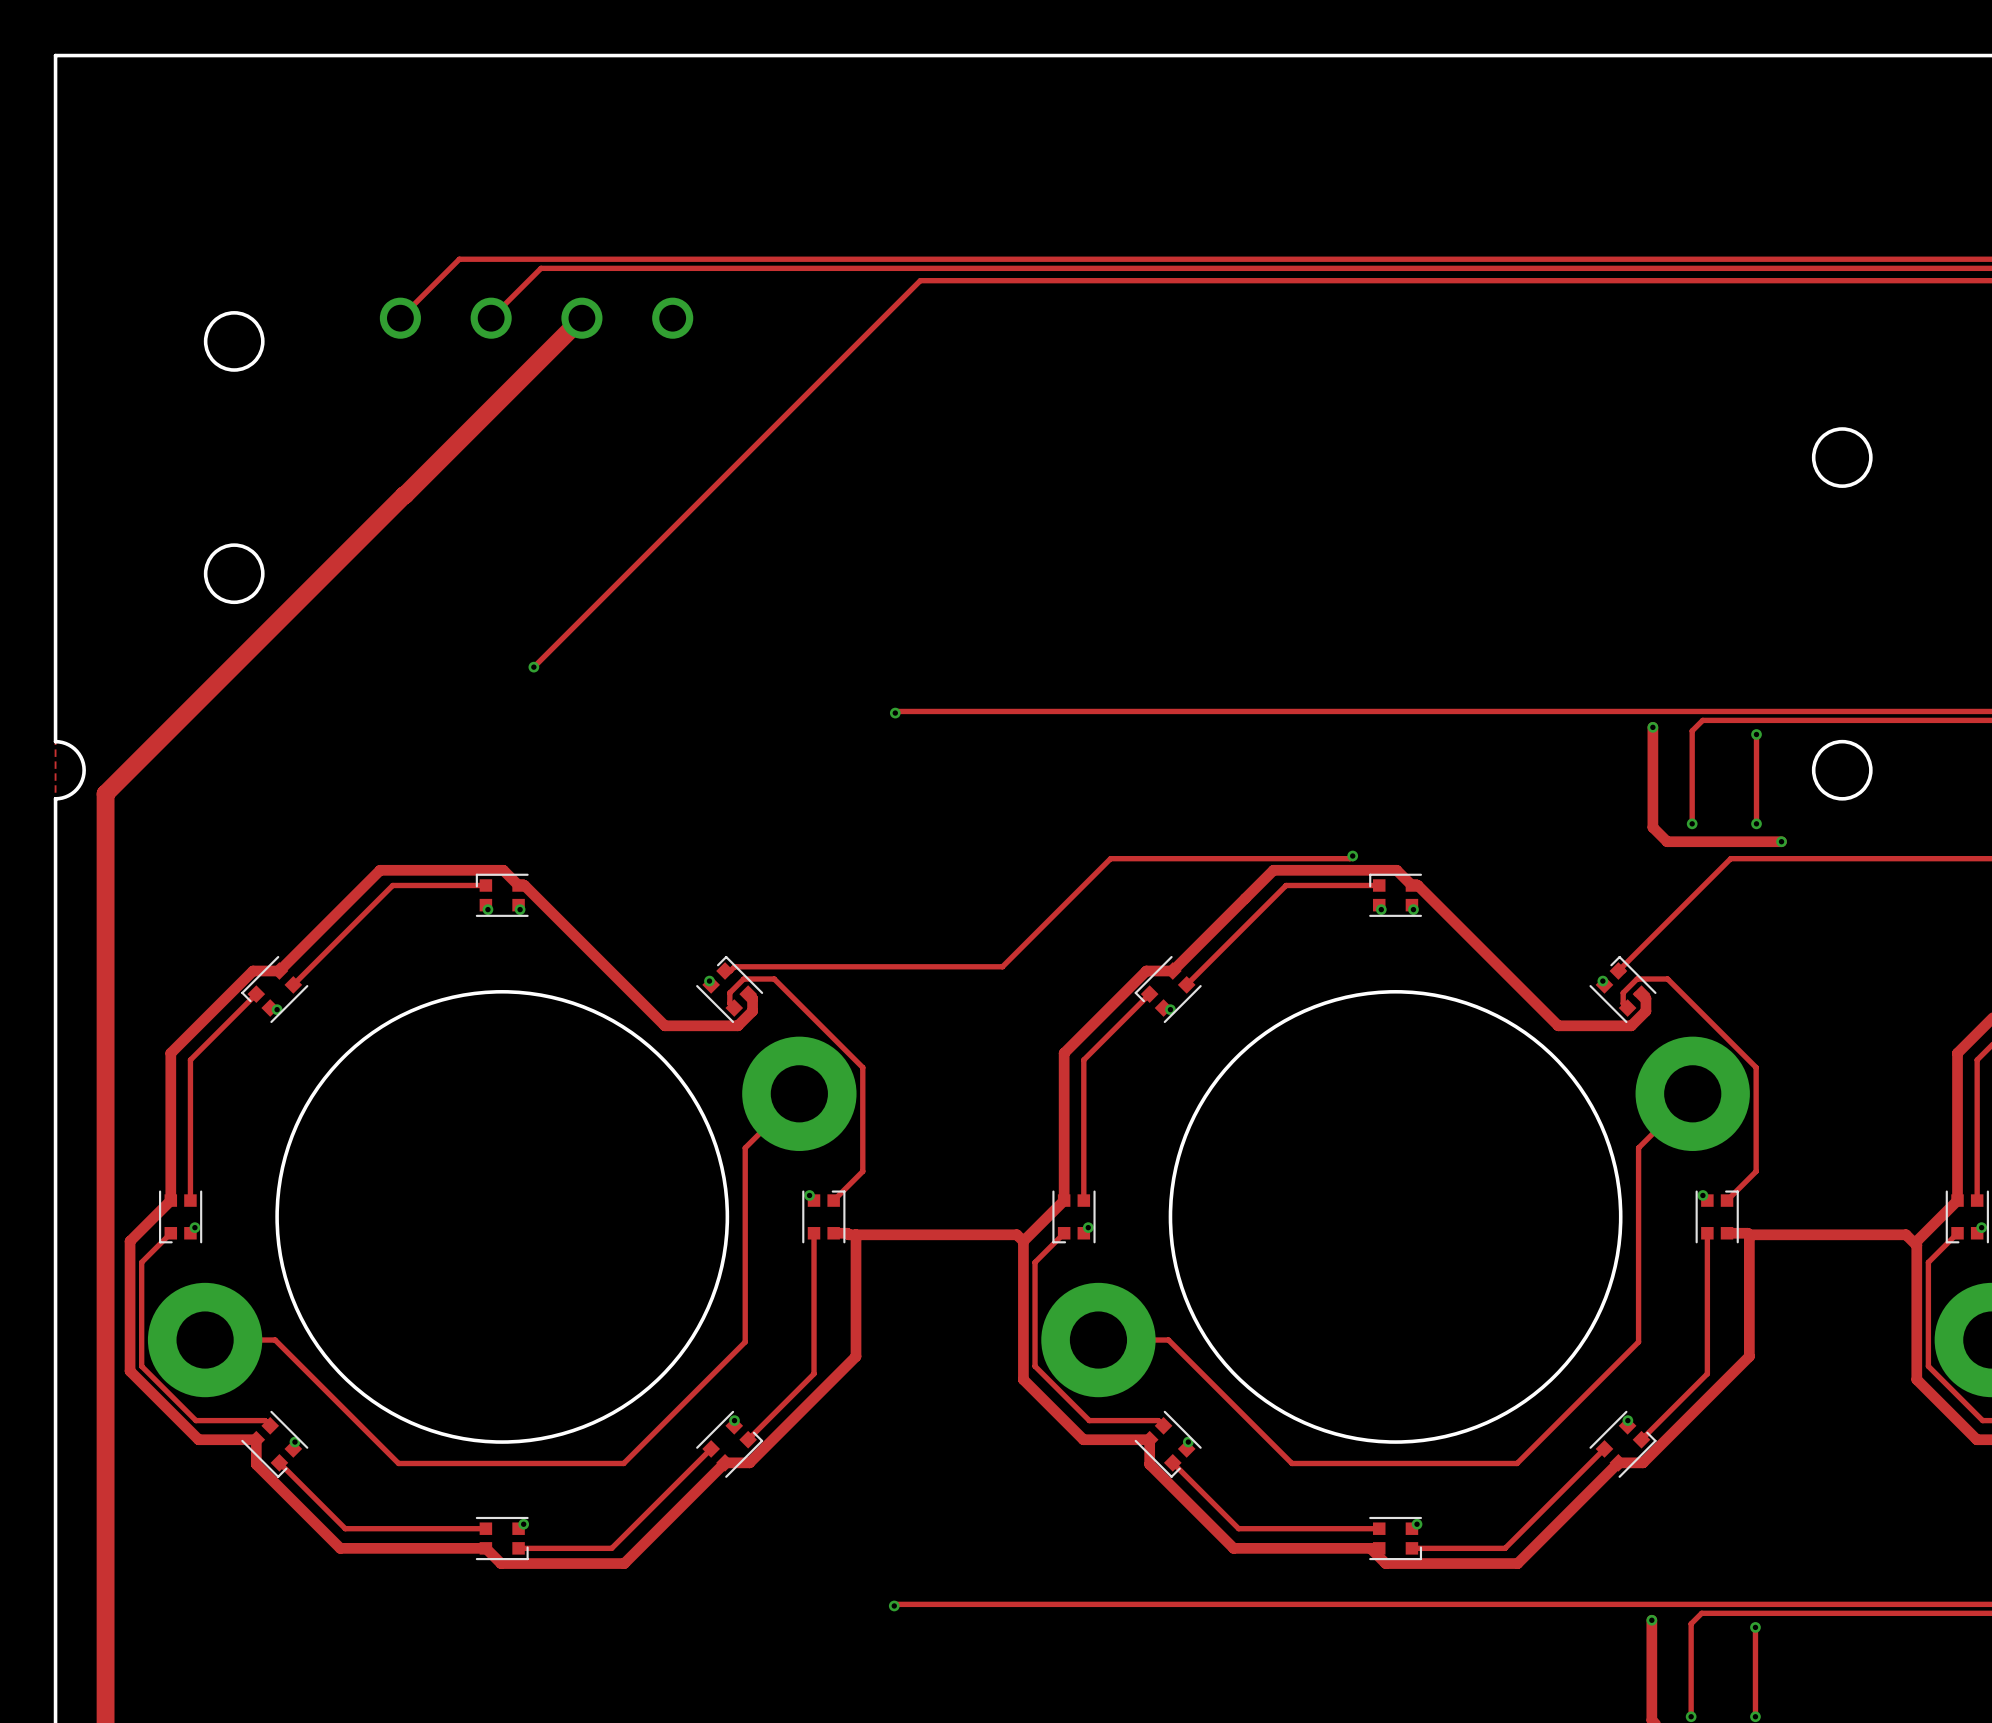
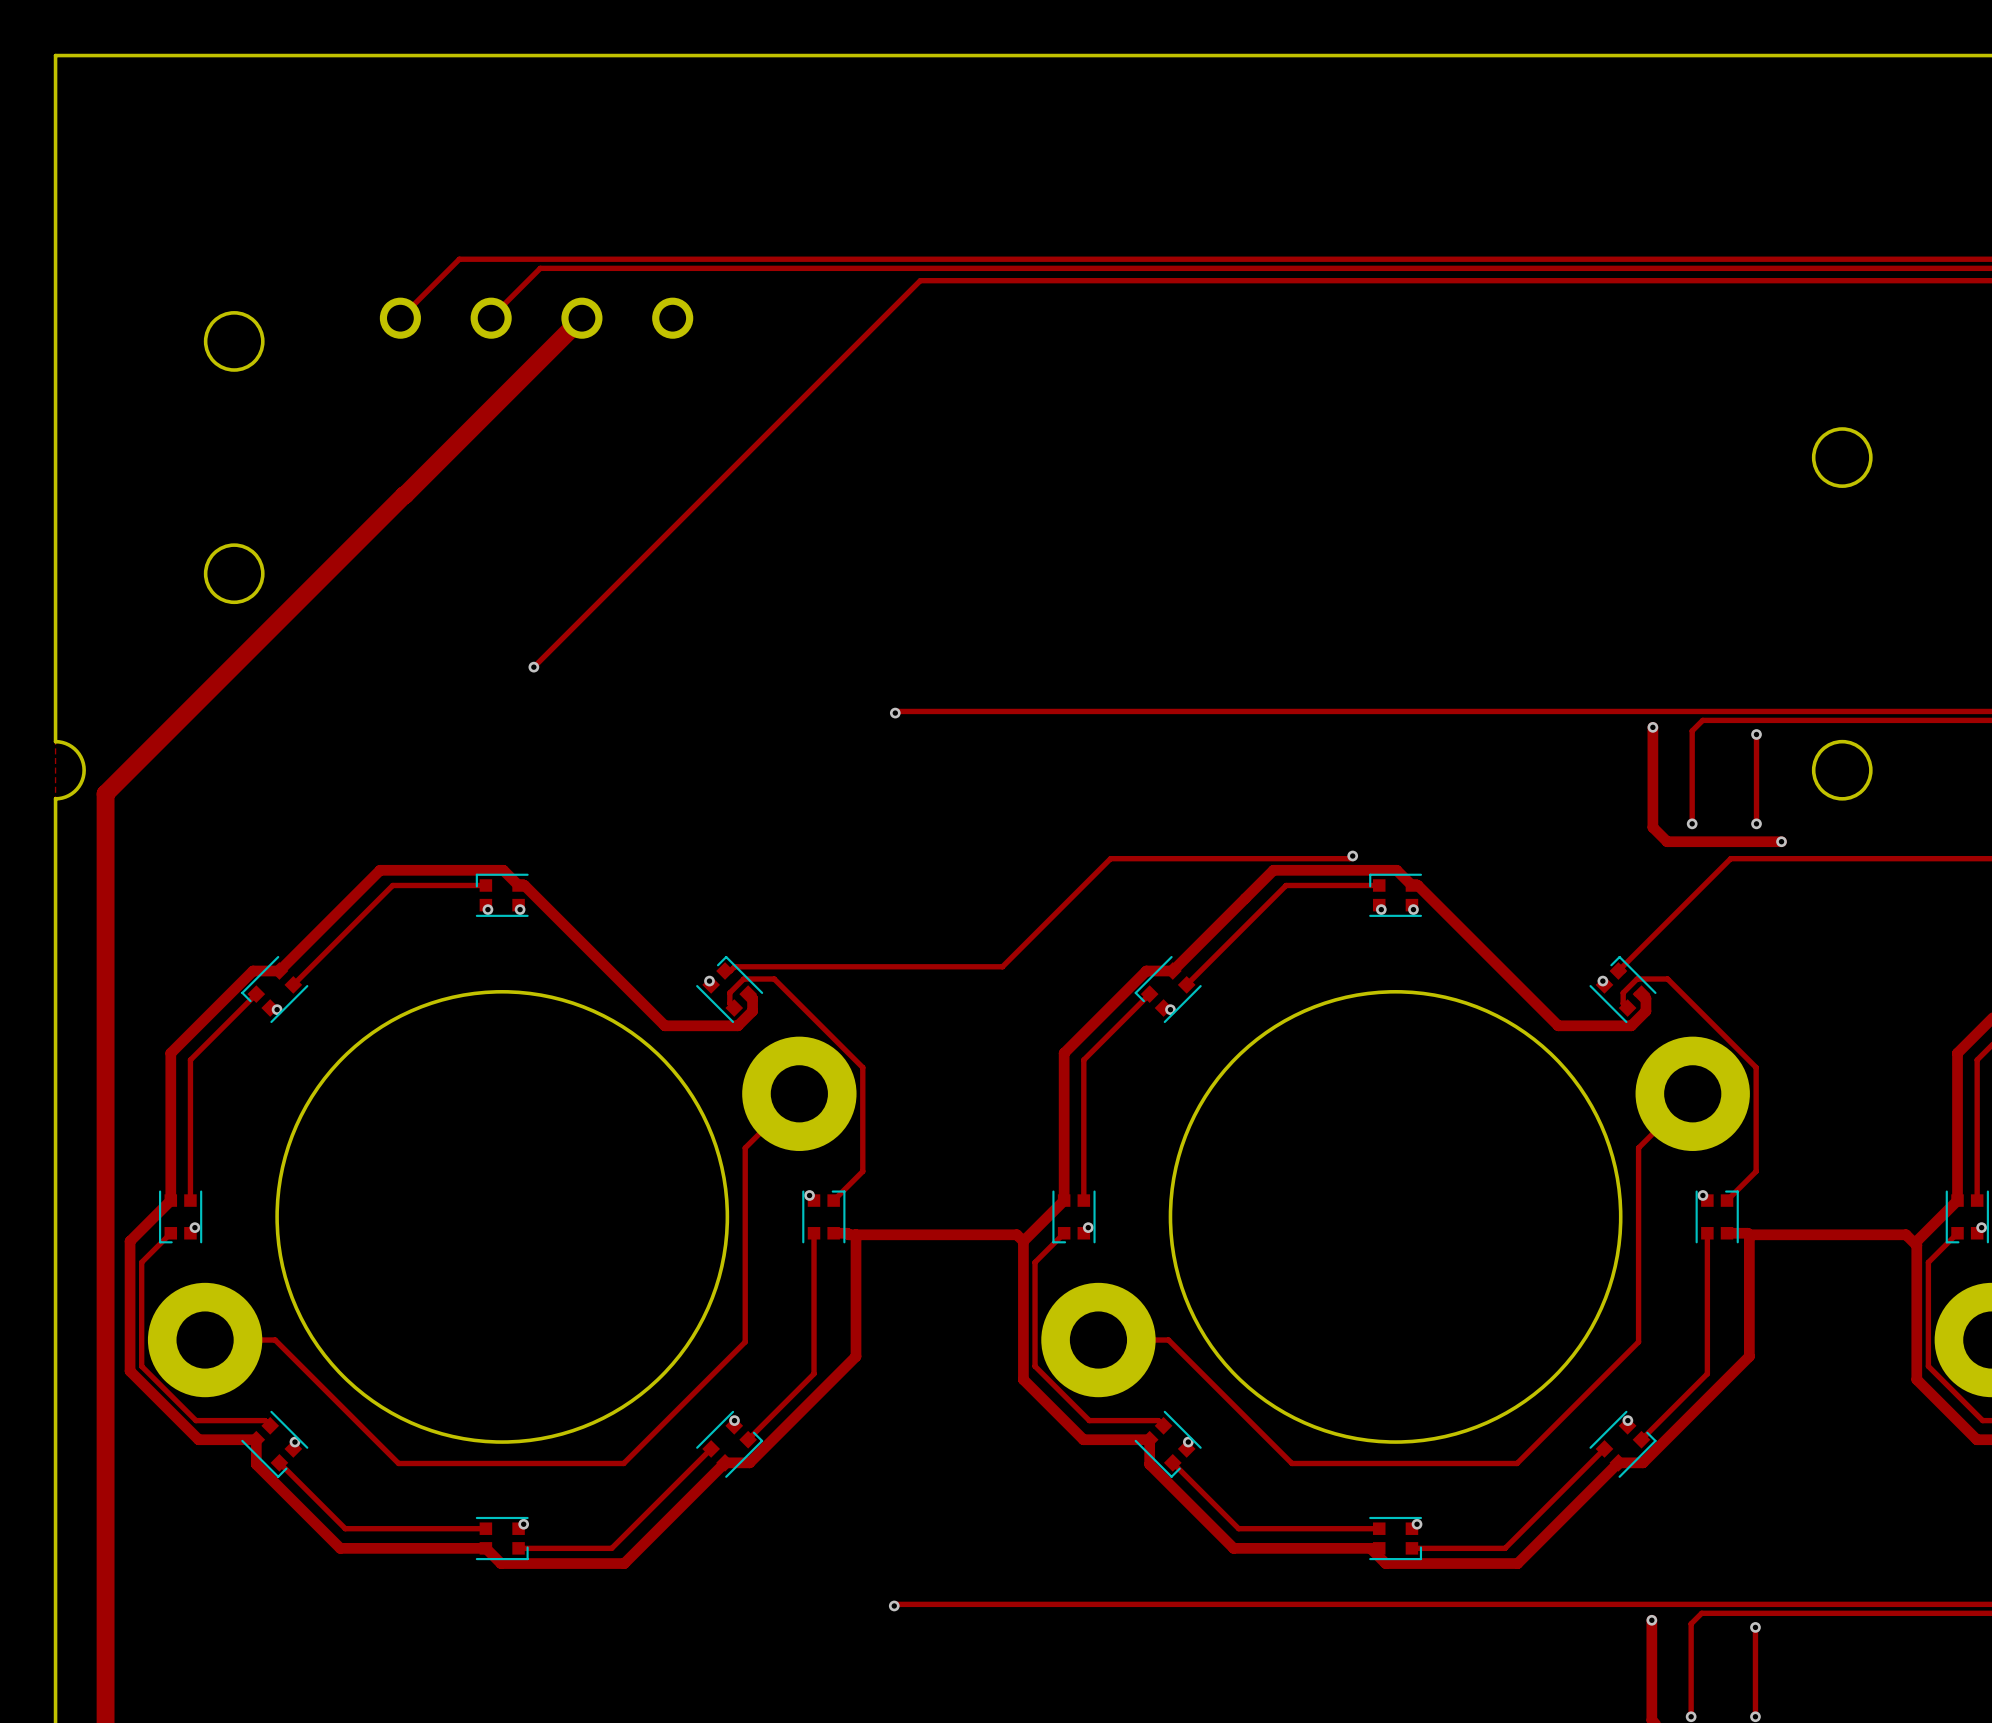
track: (541, 268) (501, 307) -> (541, 268) (492, 316)

